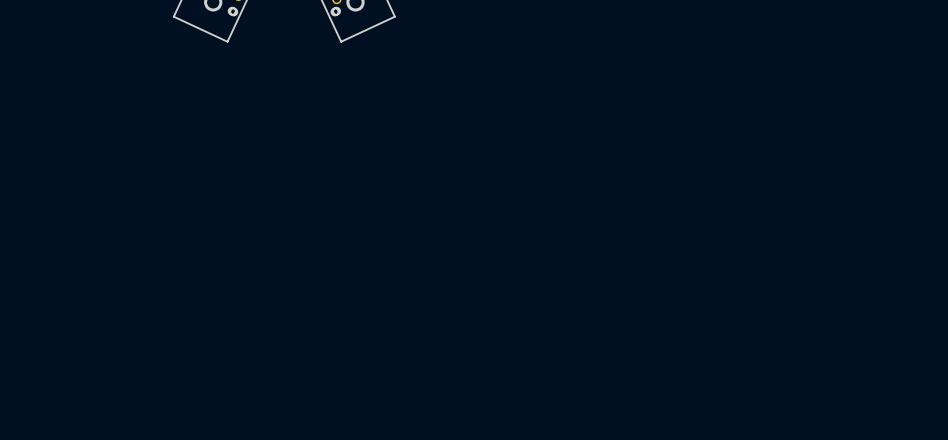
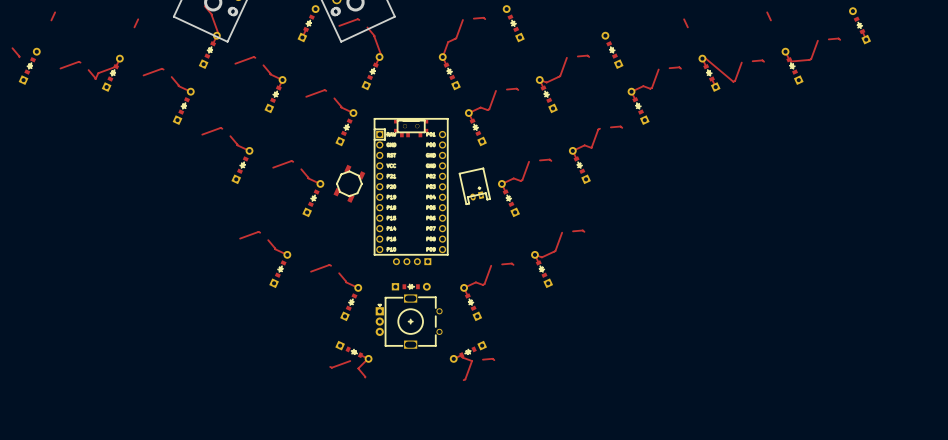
track: none -> (204, 6) (211, 14) (218, 32) (213, 43)
track: none -> (55, 12) (51, 20)
track: none -> (767, 12) (770, 20)
track: none -> (473, 18) (485, 19)
track: none -> (138, 19) (134, 27)
track: none -> (359, 19) (339, 25)
track: none -> (462, 19) (456, 38) (448, 42) (442, 57) (446, 65)
track: none -> (684, 19) (687, 27)
part: none -> (308, 23)
part: none -> (513, 23)
part: none -> (860, 25)
track: none -> (367, 27) (374, 35) (380, 54) (375, 65)
track: none -> (306, 29) (302, 37)
track: none -> (862, 31) (866, 39)
track: none -> (828, 39) (840, 39)
track: none -> (817, 40) (809, 59) (791, 61) (785, 51)
track: none -> (12, 48) (19, 57)
part: none -> (209, 50)
part: none -> (612, 50)
track: none -> (577, 56) (589, 56)
track: none -> (255, 57) (235, 63)
track: none -> (566, 57) (560, 76) (546, 82) (539, 79) (543, 88)
track: none -> (119, 58) (116, 66) (98, 73) (95, 79) (88, 70)
track: none -> (752, 61) (764, 61)
track: none -> (80, 62) (60, 68)
track: none -> (741, 62) (733, 81) (705, 58) (702, 58) (706, 66)
track: none -> (263, 65) (270, 74) (282, 80)
part: none -> (29, 66)
part: none -> (792, 66)
track: none -> (669, 68) (680, 68)
track: none -> (163, 69) (143, 75)
track: none -> (658, 69) (651, 87) (643, 86) (631, 91) (635, 99)
part: none -> (372, 71)
part: none -> (449, 71)
part: none -> (112, 73)
part: none -> (709, 73)
track: none -> (171, 77) (178, 86) (190, 91)
track: none -> (282, 79) (278, 88)
track: none -> (711, 79) (715, 87)
track: none -> (506, 89) (518, 90)
track: none -> (326, 90) (306, 96)
track: none -> (496, 90) (489, 109) (480, 107) (468, 113) (472, 121)
part: none -> (275, 94)
part: none -> (546, 94)
track: none -> (334, 98) (341, 107) (353, 113)
part: none -> (183, 106)
part: none -> (638, 106)
part: none -> (346, 127)
part: none -> (475, 127)
track: none -> (610, 127) (622, 127)
track: none -> (222, 128) (202, 134)
part: none -> (411, 128)
track: none -> (599, 128) (591, 147) (584, 145) (572, 150) (576, 158)
track: none -> (230, 136) (237, 145) (249, 150)
track: none -> (539, 160) (551, 160)
track: none -> (293, 161) (273, 167)
track: none -> (529, 161) (522, 180) (513, 178) (501, 183) (505, 192)
part: none -> (242, 165)
part: none -> (579, 165)
track: none -> (301, 169) (308, 178) (320, 183)
part: none -> (349, 183)
part: none -> (411, 186)
part: none -> (474, 186)
part: none -> (313, 198)
part: none -> (509, 198)
track: none -> (573, 231) (584, 231)
track: none -> (260, 232) (240, 238)
track: none -> (562, 232) (555, 251) (541, 257) (534, 254) (538, 262)
track: none -> (268, 240) (275, 249) (287, 254)
part: none -> (412, 261)
track: none -> (502, 264) (513, 264)
track: none -> (331, 265) (311, 271)
track: none -> (491, 265) (484, 284) (475, 282) (464, 287) (467, 295)
part: none -> (280, 269)
part: none -> (542, 269)
track: none -> (339, 273) (346, 282) (358, 287)
part: none -> (411, 286)
part: none -> (351, 302)
part: none -> (471, 302)
part: none -> (409, 321)
part: none -> (353, 351)
part: none -> (468, 351)
track: none -> (360, 355) (368, 358) (358, 368) (365, 377)
track: none -> (453, 358) (461, 355) (463, 357) (472, 361) (463, 380)
track: none -> (482, 359) (494, 360)
track: none -> (350, 361) (330, 366)

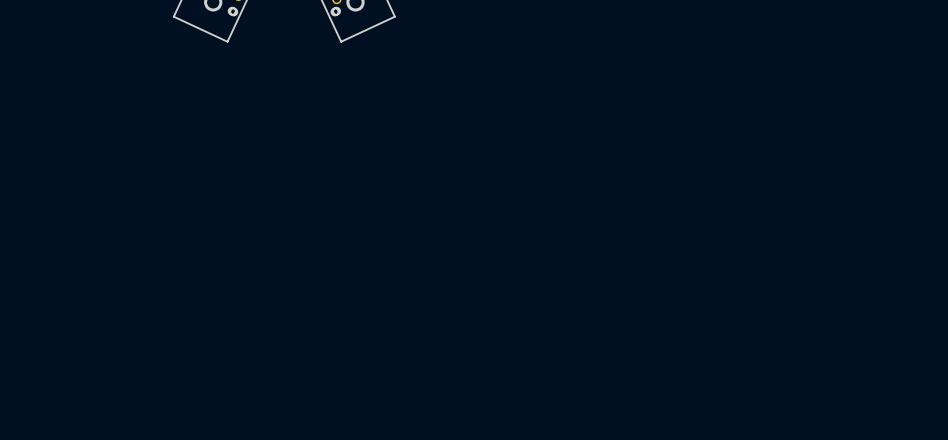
track: (204, 6) (211, 14) (218, 32) (213, 43) -> none
track: (55, 12) (51, 20) -> none
track: (767, 12) (770, 20) -> none
track: (473, 18) (485, 19) -> none
track: (138, 19) (134, 27) -> none
track: (359, 19) (339, 25) -> none
track: (462, 19) (456, 38) (448, 42) (442, 57) (446, 65) -> none
track: (684, 19) (687, 27) -> none
part: (308, 23) -> none
part: (513, 23) -> none
part: (860, 25) -> none
track: (367, 27) (374, 35) (380, 54) (375, 65) -> none
track: (306, 29) (302, 37) -> none
track: (862, 31) (866, 39) -> none
track: (828, 39) (840, 39) -> none
track: (817, 40) (809, 59) (791, 61) (785, 51) -> none
track: (12, 48) (19, 57) -> none
part: (209, 50) -> none
part: (612, 50) -> none
track: (577, 56) (589, 56) -> none
track: (255, 57) (235, 63) -> none
track: (566, 57) (560, 76) (546, 82) (539, 79) (543, 88) -> none
track: (119, 58) (116, 66) (98, 73) (95, 79) (88, 70) -> none
track: (752, 61) (764, 61) -> none
track: (80, 62) (60, 68) -> none
track: (741, 62) (733, 81) (705, 58) (702, 58) (706, 66) -> none
track: (263, 65) (270, 74) (282, 80) -> none
part: (29, 66) -> none
part: (792, 66) -> none
track: (669, 68) (680, 68) -> none
track: (163, 69) (143, 75) -> none
track: (658, 69) (651, 87) (643, 86) (631, 91) (635, 99) -> none
part: (372, 71) -> none
part: (449, 71) -> none
part: (112, 73) -> none
part: (709, 73) -> none
track: (171, 77) (178, 86) (190, 91) -> none
track: (282, 79) (278, 88) -> none
track: (711, 79) (715, 87) -> none
track: (506, 89) (518, 90) -> none
track: (326, 90) (306, 96) -> none
track: (496, 90) (489, 109) (480, 107) (468, 113) (472, 121) -> none
part: (275, 94) -> none
part: (546, 94) -> none
track: (334, 98) (341, 107) (353, 113) -> none
part: (183, 106) -> none
part: (638, 106) -> none
part: (346, 127) -> none
part: (475, 127) -> none
track: (610, 127) (622, 127) -> none
track: (222, 128) (202, 134) -> none
part: (411, 128) -> none
track: (599, 128) (591, 147) (584, 145) (572, 150) (576, 158) -> none
track: (230, 136) (237, 145) (249, 150) -> none
track: (539, 160) (551, 160) -> none
track: (293, 161) (273, 167) -> none
track: (529, 161) (522, 180) (513, 178) (501, 183) (505, 192) -> none
part: (242, 165) -> none
part: (579, 165) -> none
track: (301, 169) (308, 178) (320, 183) -> none
part: (349, 183) -> none
part: (411, 186) -> none
part: (474, 186) -> none
part: (313, 198) -> none
part: (509, 198) -> none
track: (573, 231) (584, 231) -> none
track: (260, 232) (240, 238) -> none
track: (562, 232) (555, 251) (541, 257) (534, 254) (538, 262) -> none
track: (268, 240) (275, 249) (287, 254) -> none
part: (412, 261) -> none
track: (502, 264) (513, 264) -> none
track: (331, 265) (311, 271) -> none
track: (491, 265) (484, 284) (475, 282) (464, 287) (467, 295) -> none
part: (280, 269) -> none
part: (542, 269) -> none
track: (339, 273) (346, 282) (358, 287) -> none
part: (411, 286) -> none
part: (351, 302) -> none
part: (471, 302) -> none
part: (409, 321) -> none
part: (353, 351) -> none
part: (468, 351) -> none
track: (360, 355) (368, 358) (358, 368) (365, 377) -> none
track: (453, 358) (461, 355) (463, 357) (472, 361) (463, 380) -> none
track: (482, 359) (494, 360) -> none
track: (350, 361) (330, 366) -> none

